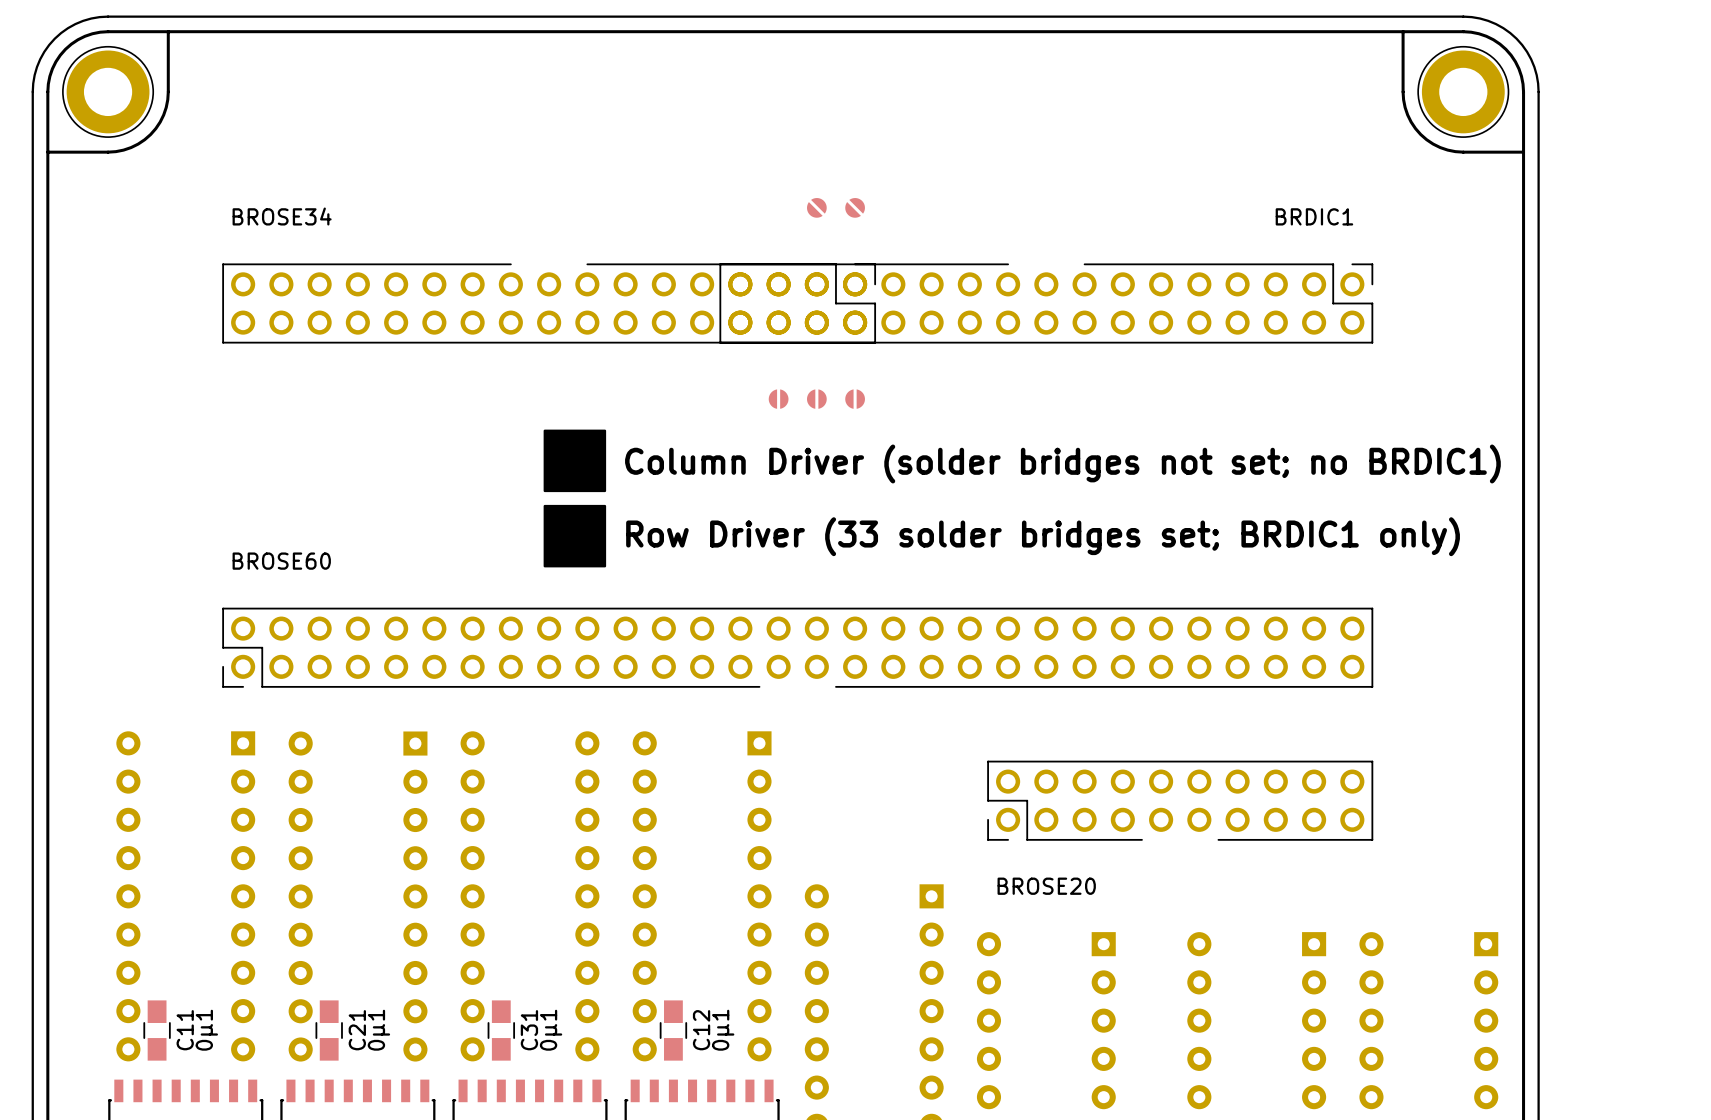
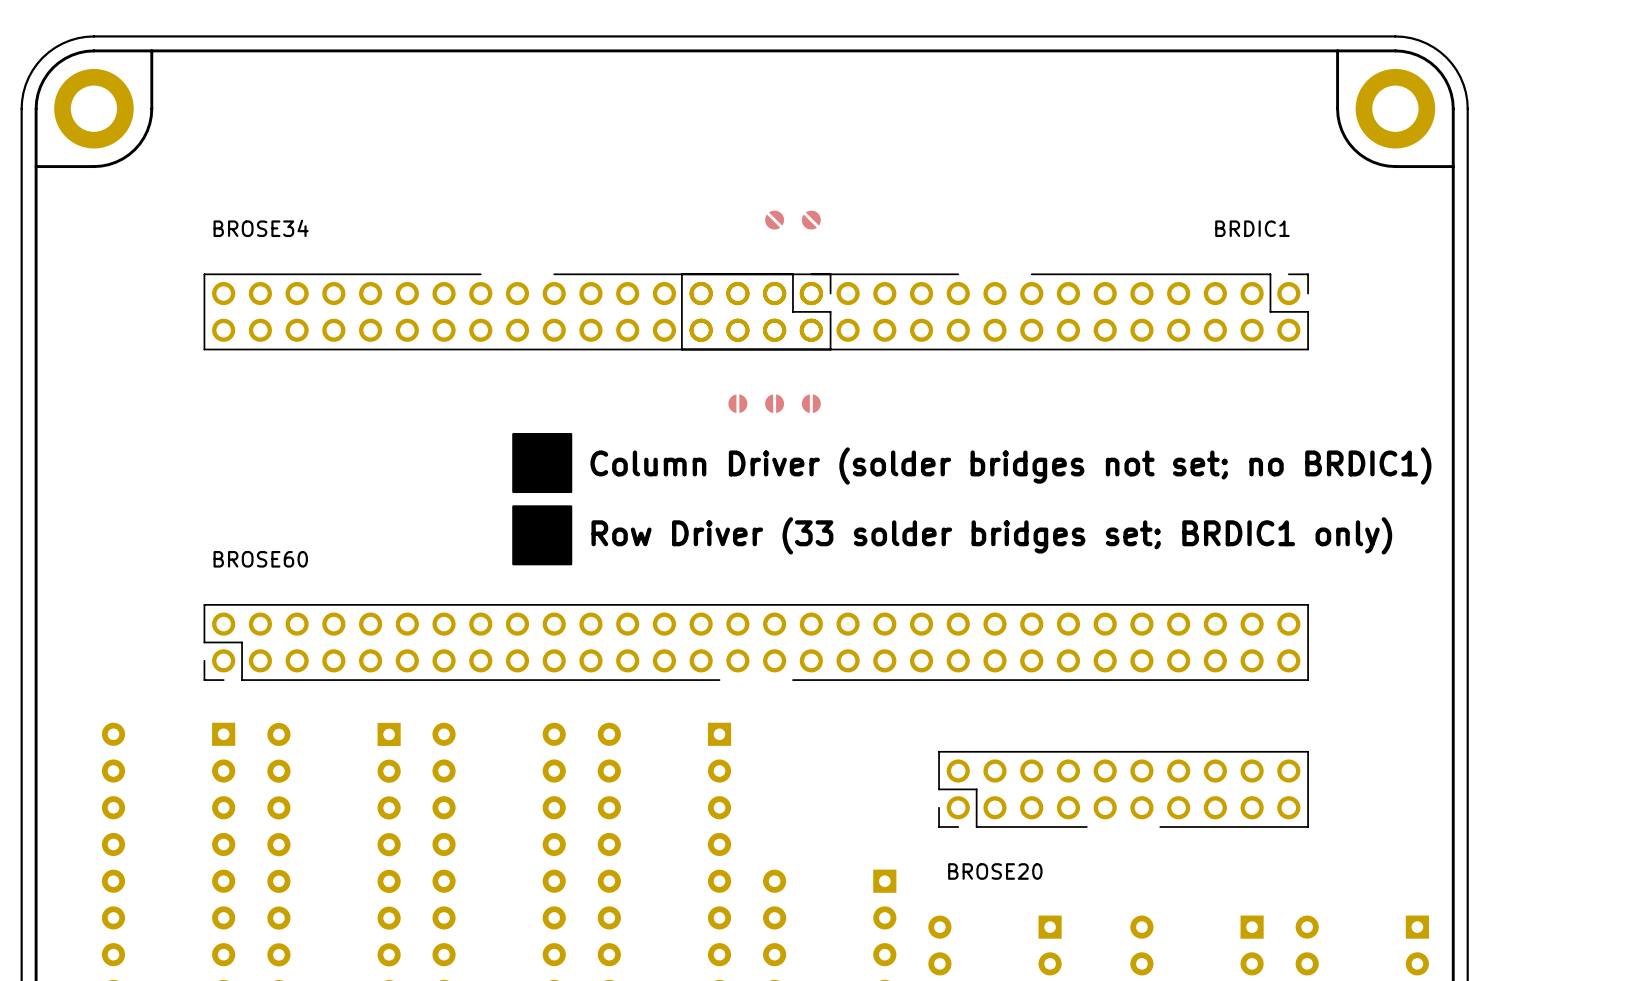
drawing: [62, 45, 155, 138] -> none
drawing: [1417, 45, 1510, 138] -> none

